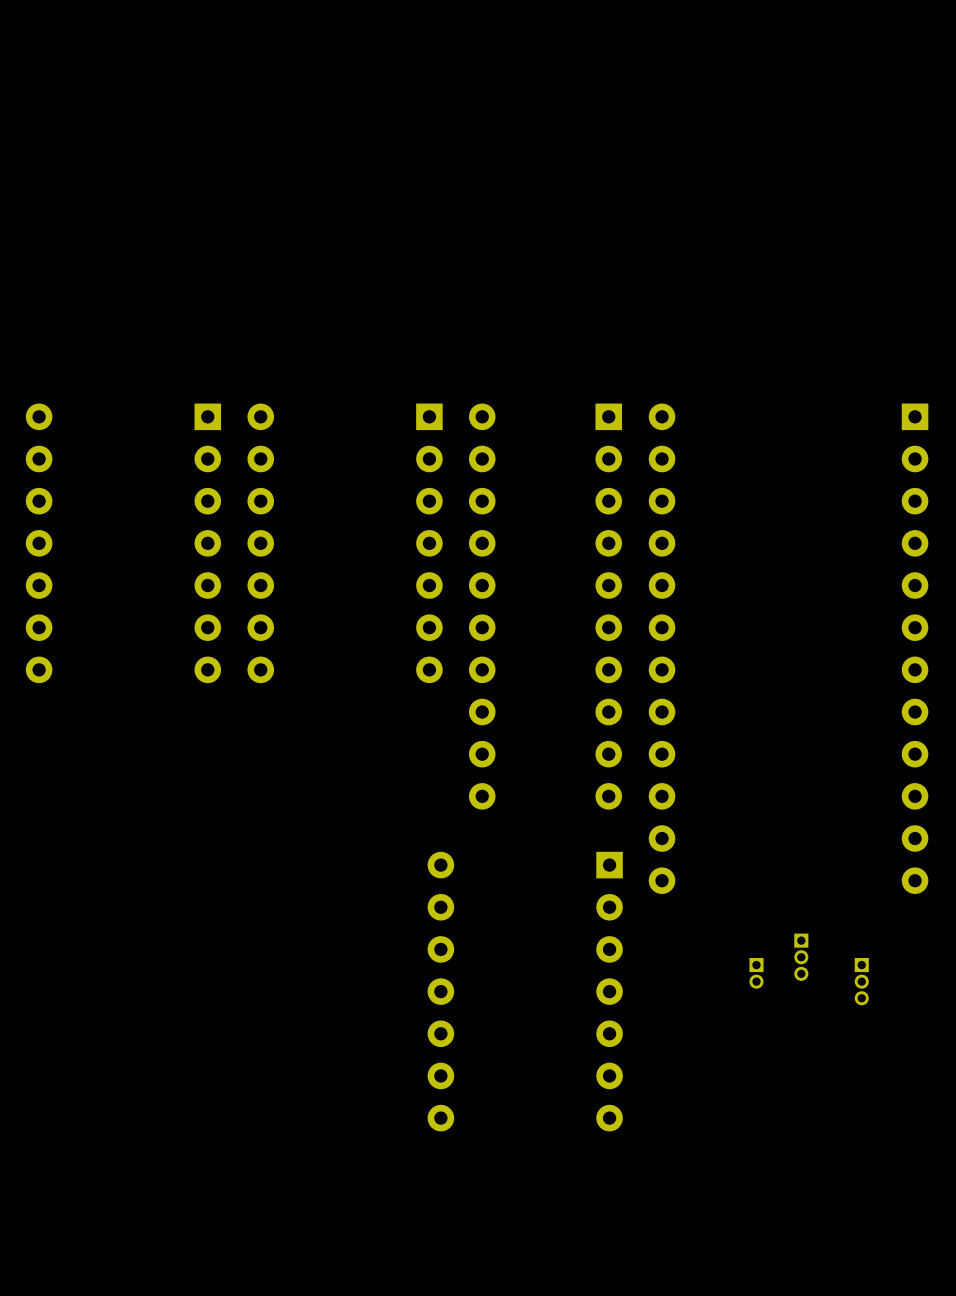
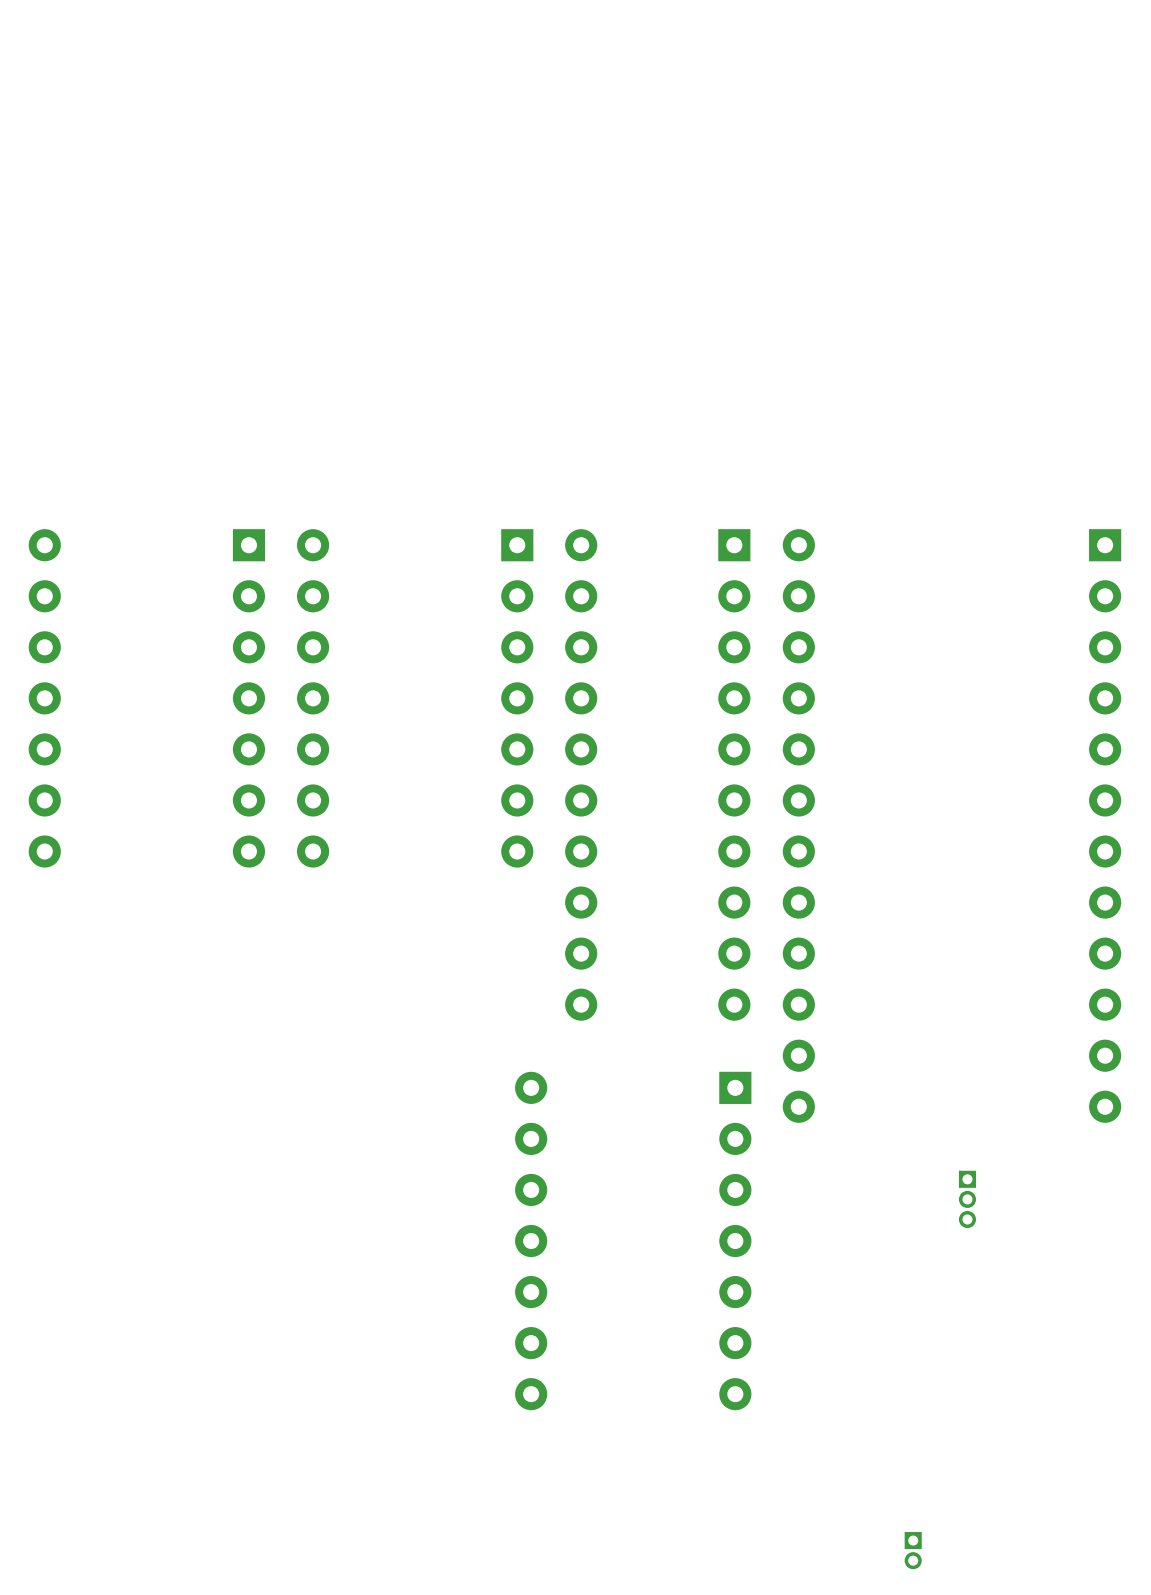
part position: (756, 973) -> (913, 1550)
part: (861, 981) -> none

